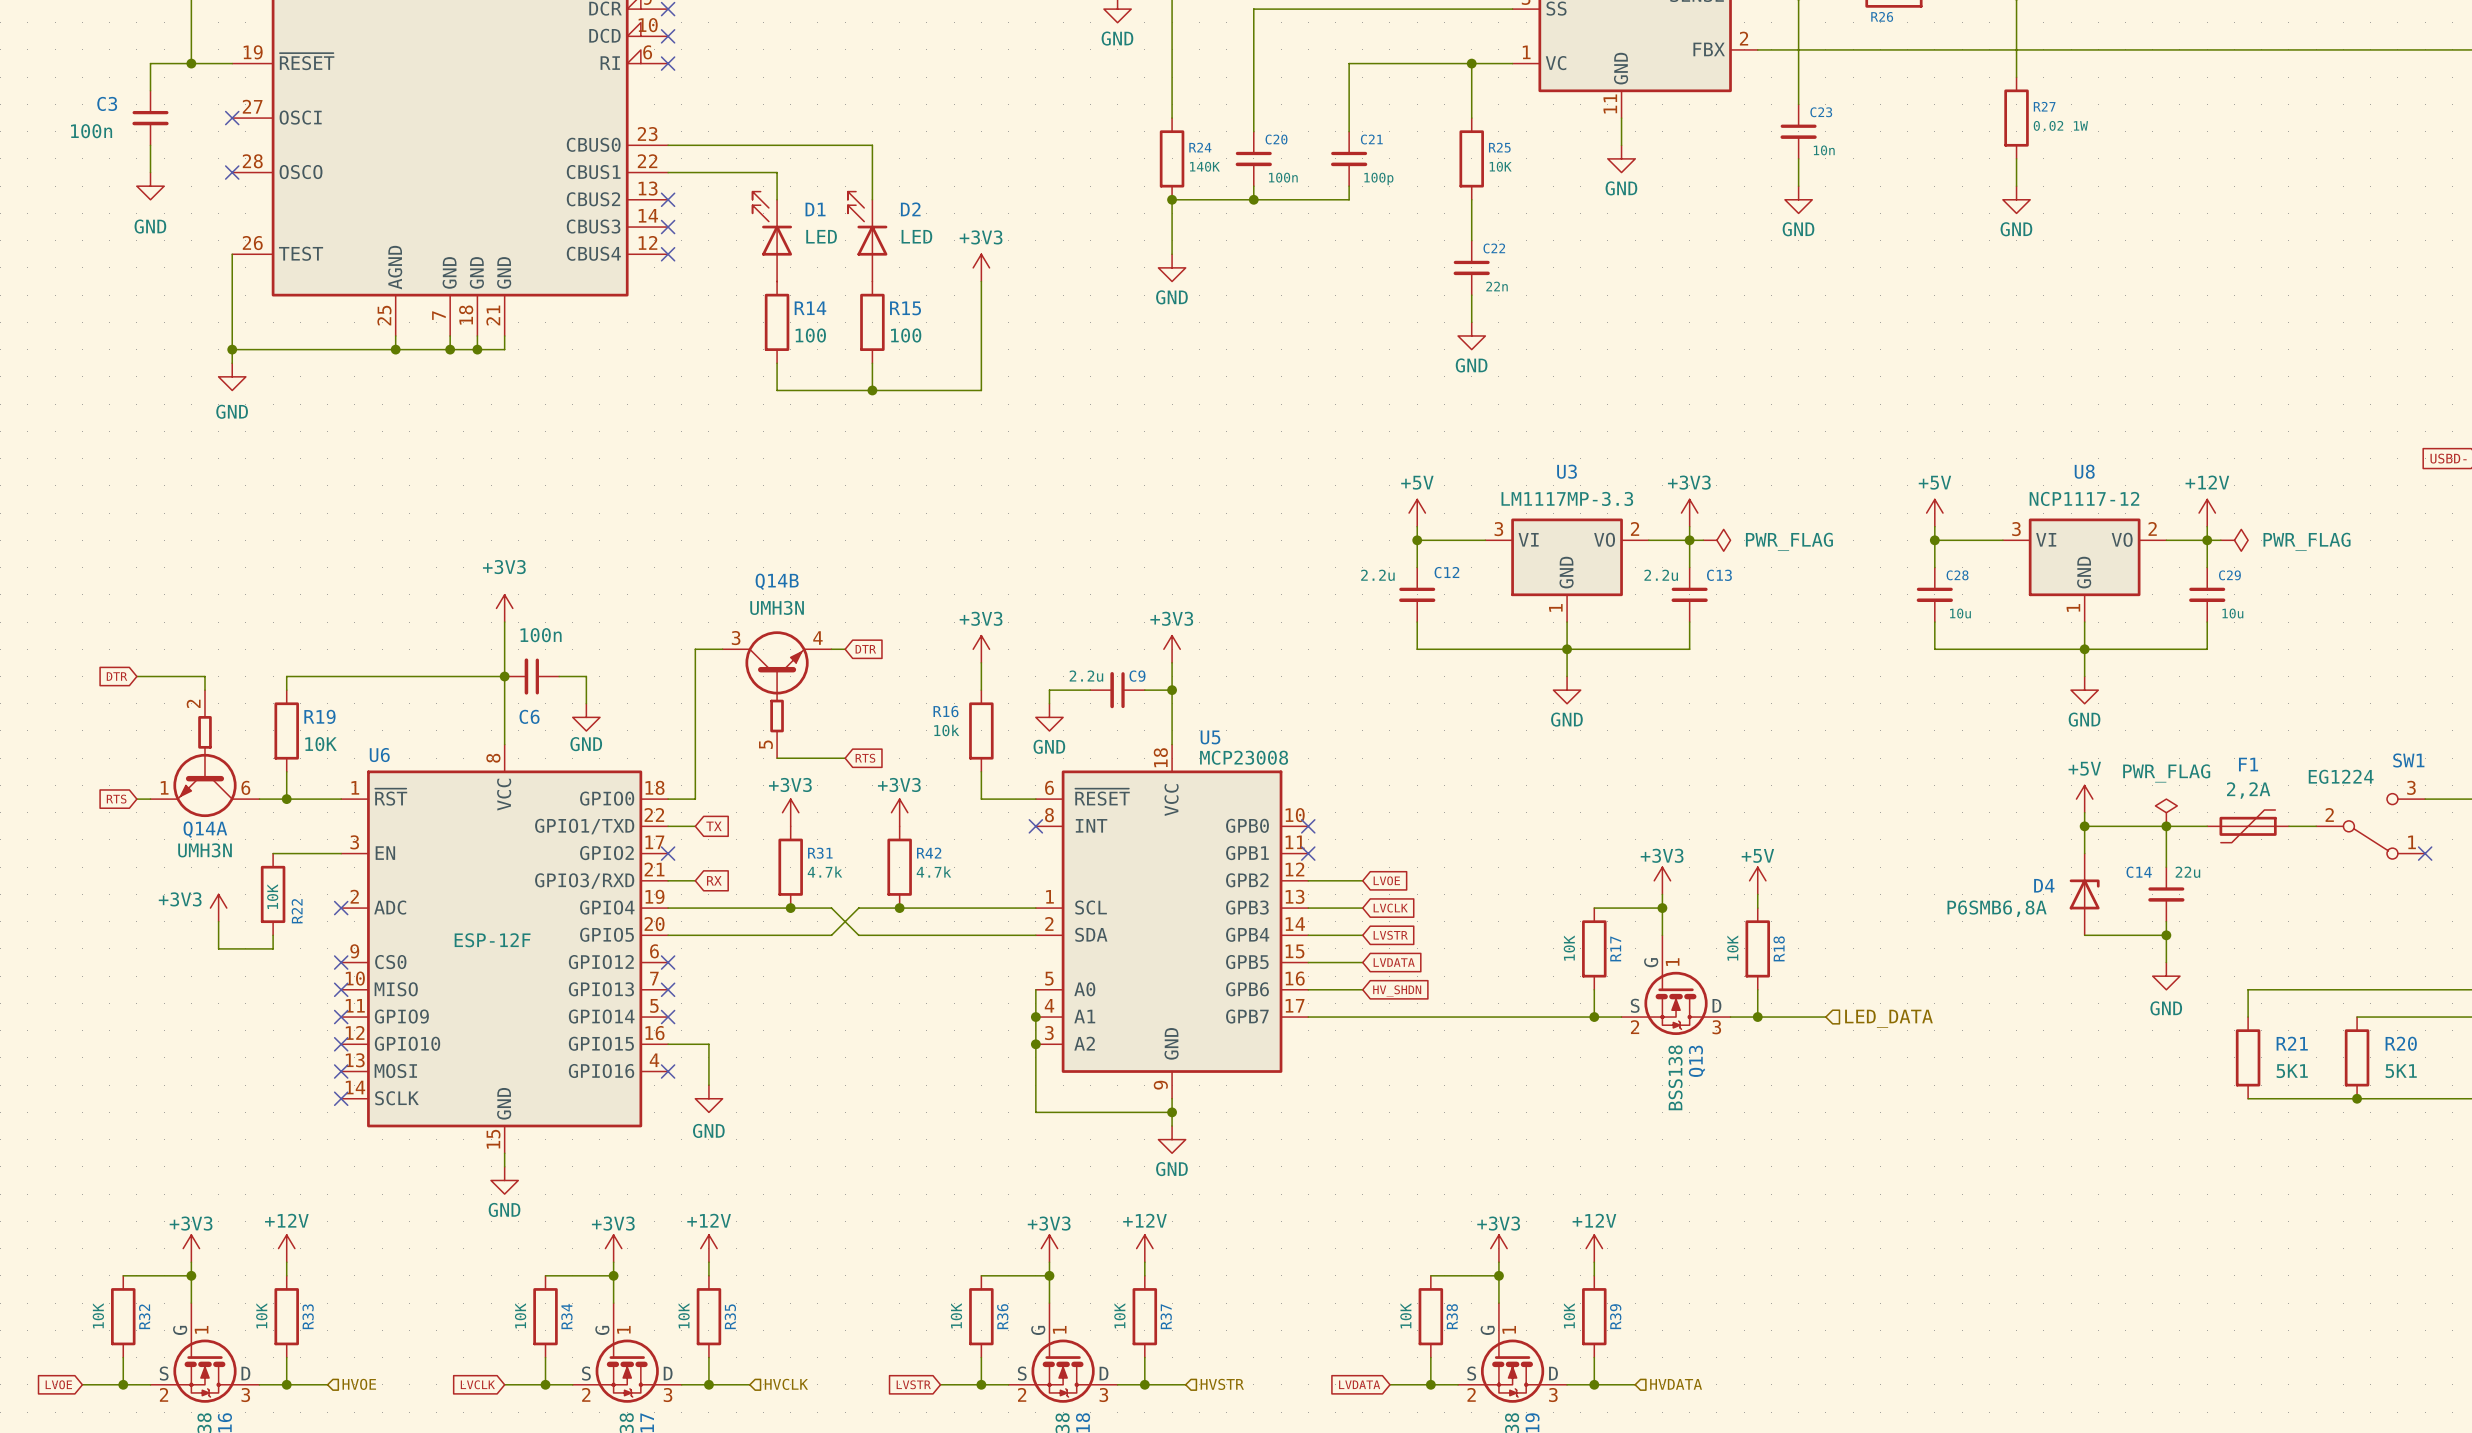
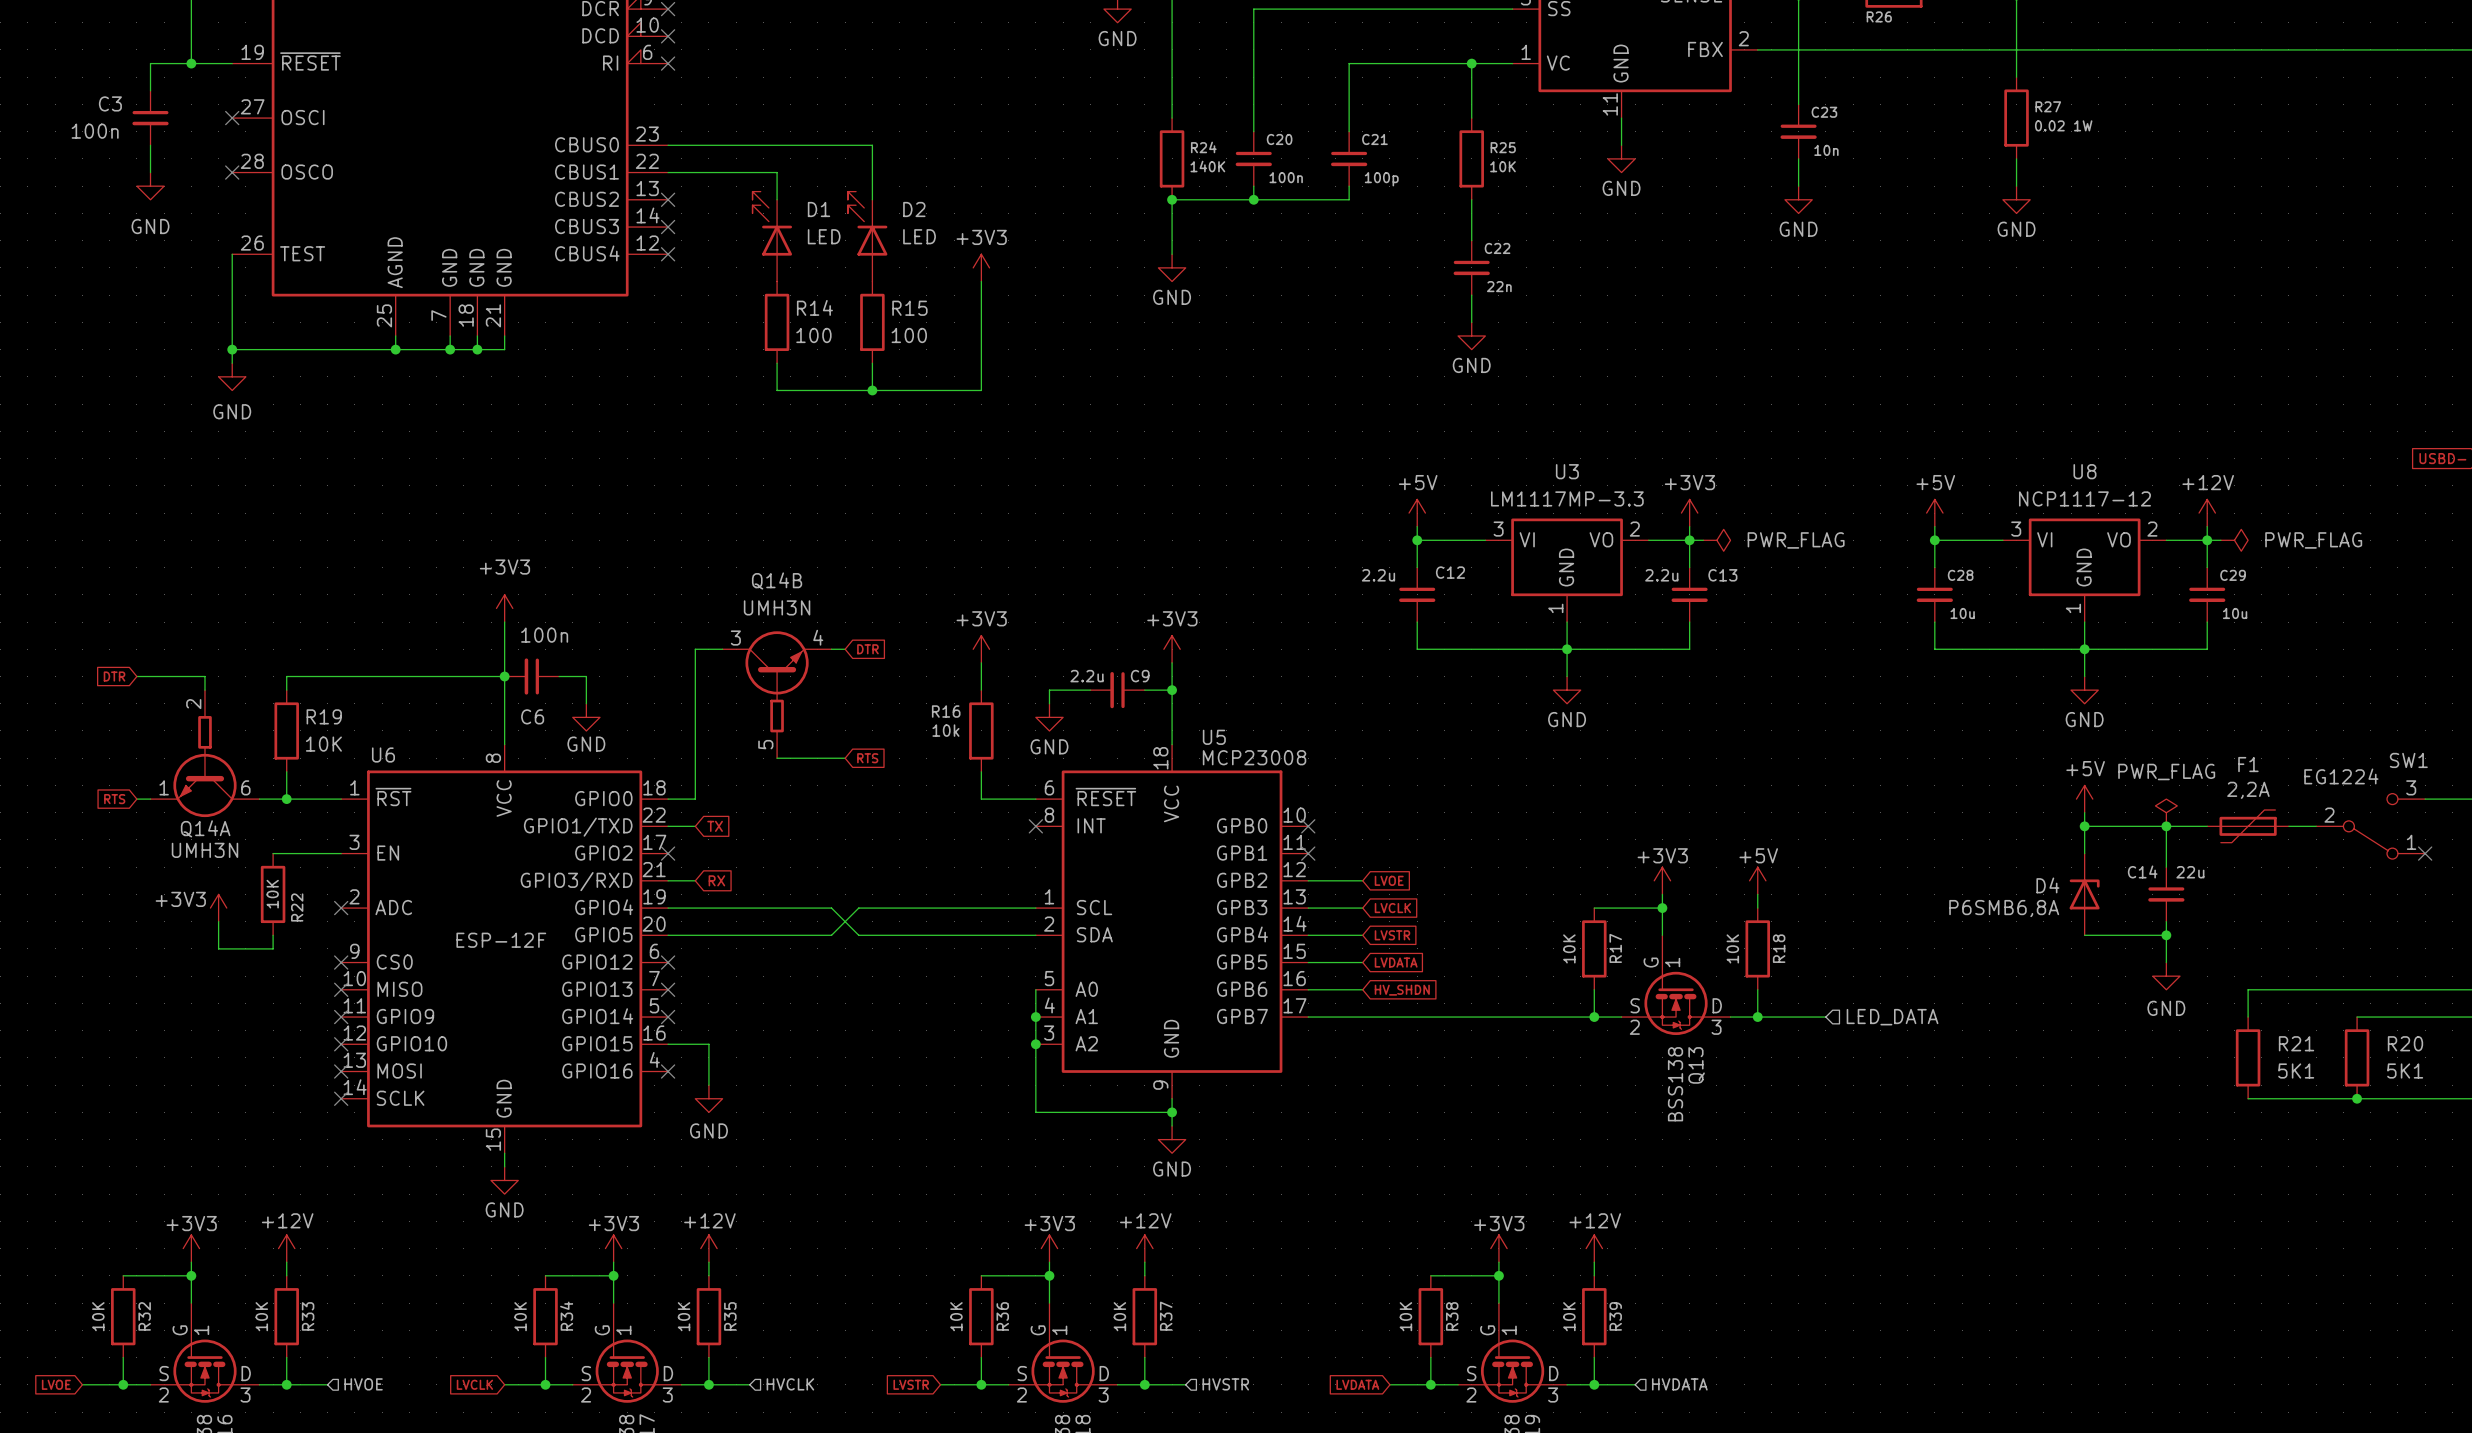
power symbol: +3V3 (790, 812) -> none
power symbol: +3V3 (899, 812) -> none
R31: 4.7k (790, 867) -> none
R42: 4.7k (899, 867) -> none
junction: (790, 908) -> none
junction: (899, 908) -> none

